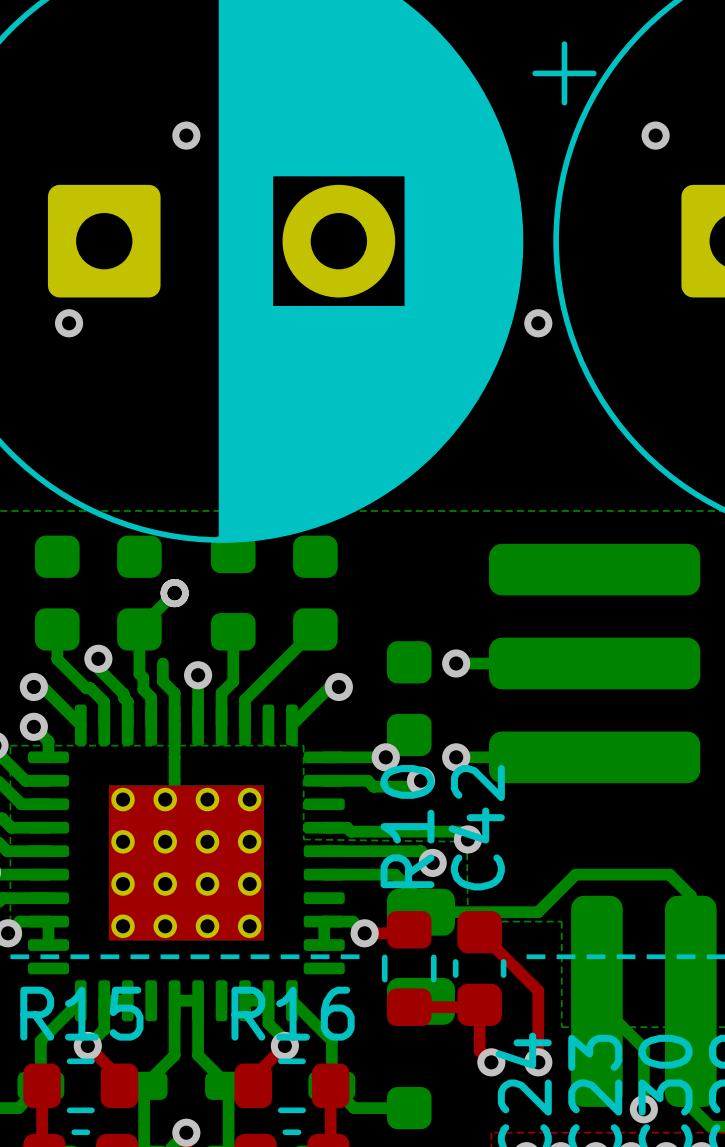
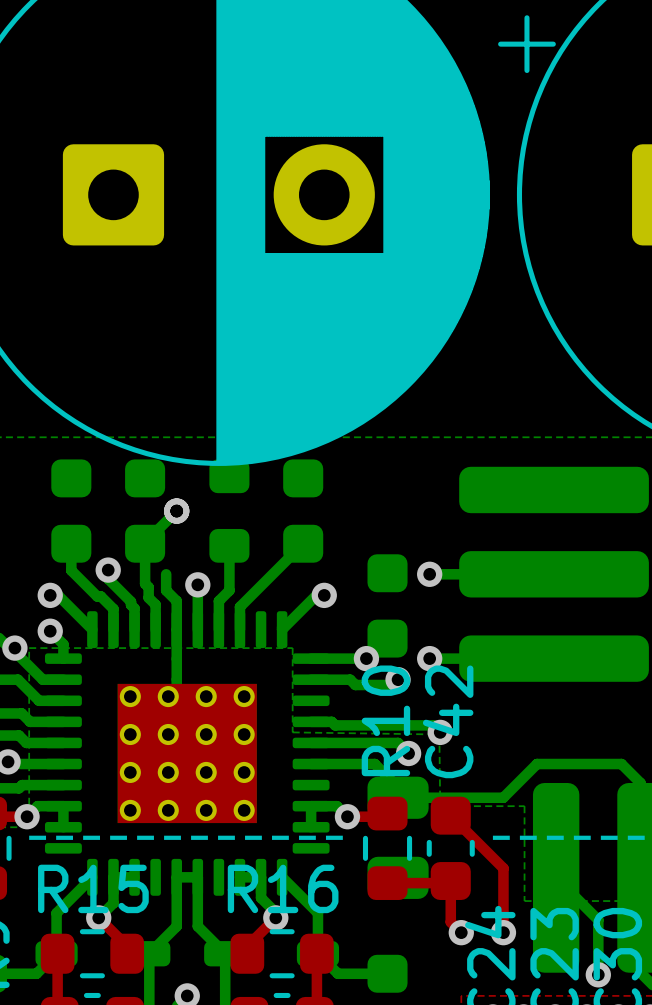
via: (186, 135) -> none
via: (655, 135) -> none
via: (69, 323) -> none
via: (538, 323) -> none

